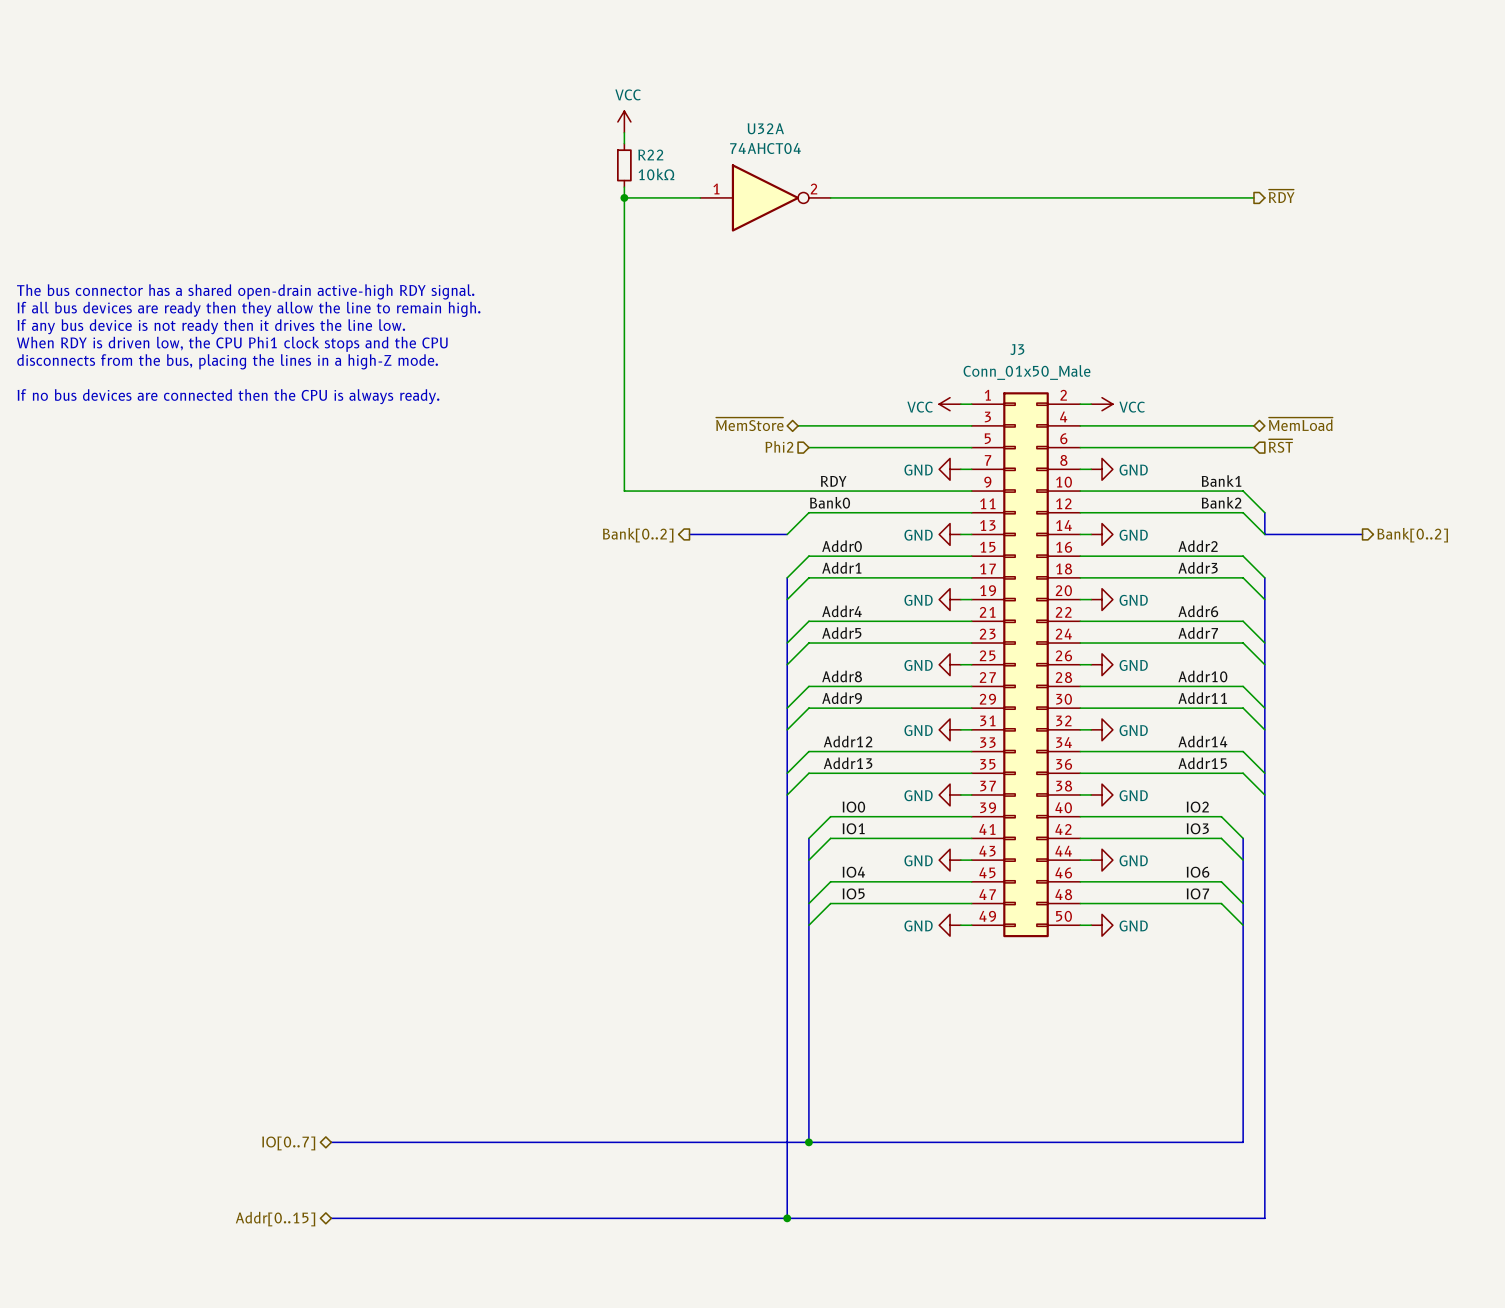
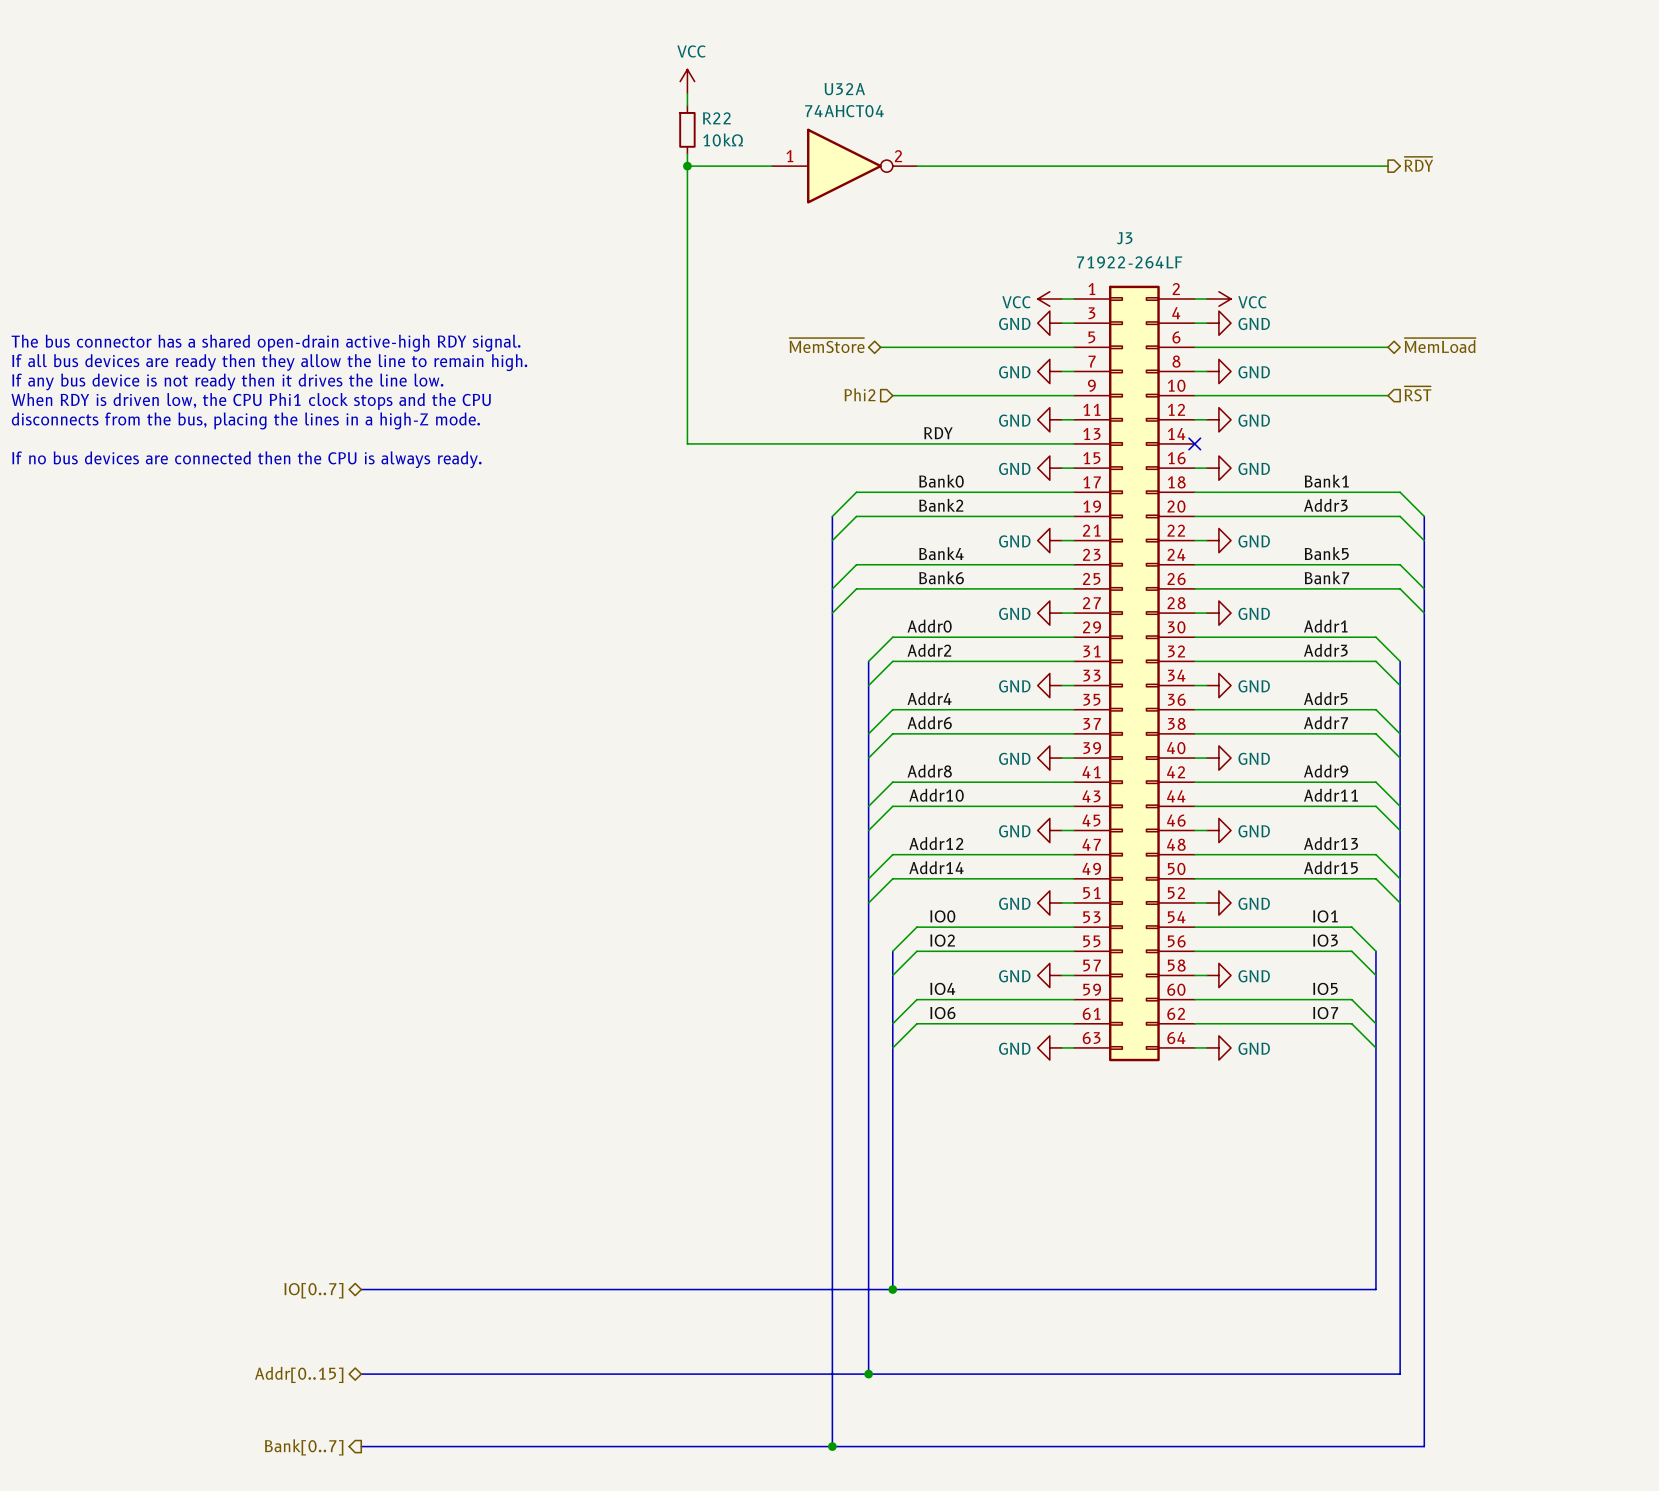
wire: none -> (687, 93) (687, 105)
wire: none -> (687, 154) (687, 166) (771, 166)
power symbol position: VCC (624, 121) -> VCC (687, 81)
junction: none -> (687, 166)
wire: none -> (687, 178) (687, 226)
R22 position: (624, 165) -> (687, 129)
hierarchical label position: ~{RDY} (1281, 196) -> ~{RDY} (1418, 164)
wire: (624, 197) (700, 197) -> none
junction: (624, 197) -> none
U32A position: (765, 197) -> (844, 166)
wire: (830, 197) (1253, 197) -> (916, 166) (1388, 166)
power symbol: none -> VCC (1049, 299)
wire: none -> (1061, 299) (1073, 299)
wire: none -> (1194, 299) (1206, 299)
power symbol: none -> VCC (1218, 299)
power symbol: none -> GND (1049, 323)
wire: none -> (1061, 323) (1073, 323)
wire: none -> (1194, 323) (1206, 323)
power symbol: none -> GND (1218, 323)
wire: none -> (880, 347) (1073, 347)
wire: none -> (1194, 347) (1388, 347)
power symbol: none -> GND (1049, 371)
wire: none -> (1061, 371) (1073, 371)
wire: none -> (1194, 371) (1206, 371)
power symbol: none -> GND (1218, 371)
wire: none -> (892, 395) (1073, 395)
wire: none -> (1194, 395) (1388, 395)
J3 name position: J3 (1017, 349) -> J3 (1124, 238)
power symbol: none -> GND (1049, 419)
wire: none -> (1061, 419) (1073, 419)
wire: none -> (1194, 419) (1206, 419)
power symbol: none -> GND (1218, 419)
J3 value: Conn_01x50_Male (1026, 372) -> 71922-264LF (1129, 262)
wire: (624, 382) (624, 491) (776, 491) -> (832, 588) (856, 564)
wire: none -> (687, 443) (1073, 443)
no-connect mark: none -> (1194, 443)
J3 symbol: [971, 392, 1081, 938] -> [1073, 285, 1195, 1062]
power symbol: VCC (950, 404) -> GND (1049, 468)
power symbol: VCC (1102, 404) -> GND (1218, 468)
hierarchical label position: ~{MemStore} (749, 424) -> ~{MemStore} (826, 345)
hierarchical label position: ~{MemLoad} (1300, 424) -> ~{MemLoad} (1440, 345)
wire: none -> (880, 492) (856, 492) (832, 516)
wire: none -> (1388, 492) (1400, 492) (1424, 516)
label: none -> Bank2 (941, 505)
label: none -> Addr3 (1325, 505)
hierarchical label position: Phi2 (779, 446) -> Phi2 (859, 394)
hierarchical label position: ~{RST} (1280, 446) -> ~{RST} (1417, 393)
bus: none -> (832, 516) (832, 1446)
wire: none -> (892, 516) (856, 516) (832, 540)
wire: none -> (1388, 516) (1400, 516) (1424, 540)
bus: none -> (1424, 516) (1424, 1446) (361, 1446)
label position: RDY (833, 481) -> RDY (938, 433)
label: none -> Bank4 (941, 553)
label: none -> Bank5 (1326, 553)
label position: Bank1 (1221, 481) -> Bank1 (1326, 481)
wire: (1243, 491) (1264, 512) -> (1375, 564) (1400, 564) (1424, 588)
label position: Bank0 (830, 502) -> Bank0 (941, 481)
label: none -> Bank6 (941, 577)
label: none -> Bank7 (1326, 577)
label: Bank2 (1221, 502) -> none
wire: (808, 512) (787, 534) -> (892, 588) (856, 588) (832, 613)
wire: (1243, 512) (1264, 534) -> (1375, 588) (1400, 588) (1424, 613)
bus: (1264, 512) (1264, 534) (1362, 534) -> none
bus: (689, 534) (787, 534) -> none
hierarchical label: Bank[0..2] (638, 535) -> none
hierarchical label: Bank[0..2] (1412, 535) -> none
label: Addr2 (1198, 546) -> Addr1 (1325, 626)
label: Addr1 (841, 567) -> Addr2 (929, 650)
label: Addr6 (1198, 611) -> Addr5 (1325, 698)
label: Addr5 (841, 633) -> Addr6 (929, 722)
label: Addr10 (1202, 676) -> Addr9 (1326, 771)
label: Addr9 (842, 698) -> Addr10 (936, 795)
label: Addr14 (1202, 741) -> Addr13 (1330, 843)
label: Addr13 (848, 763) -> Addr14 (936, 867)
label: IO2 (1197, 807) -> IO1 (1325, 916)
label: IO1 (853, 828) -> IO2 (942, 940)
label: IO6 (1198, 872) -> IO5 (1325, 988)
label: IO5 (853, 893) -> IO6 (942, 1013)
junction: none -> (832, 1446)
hierarchical label: none -> Bank[0..7] (304, 1447)

